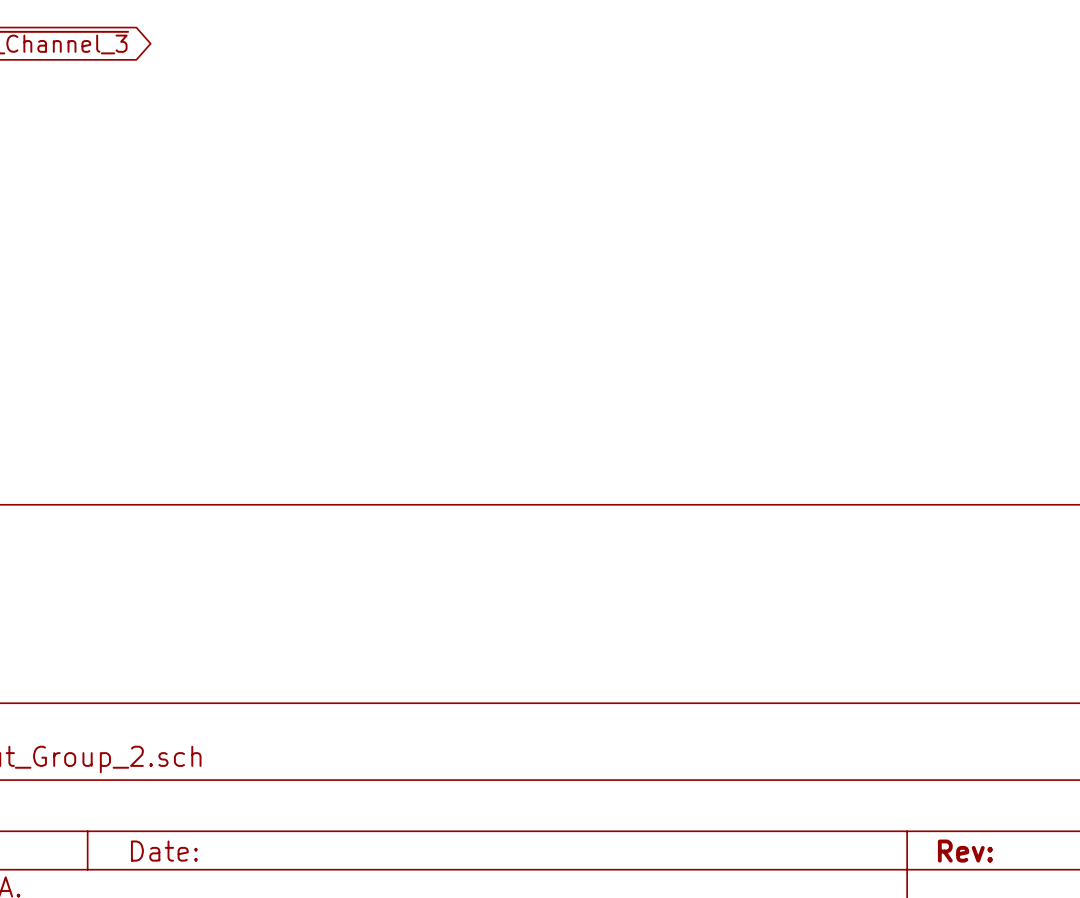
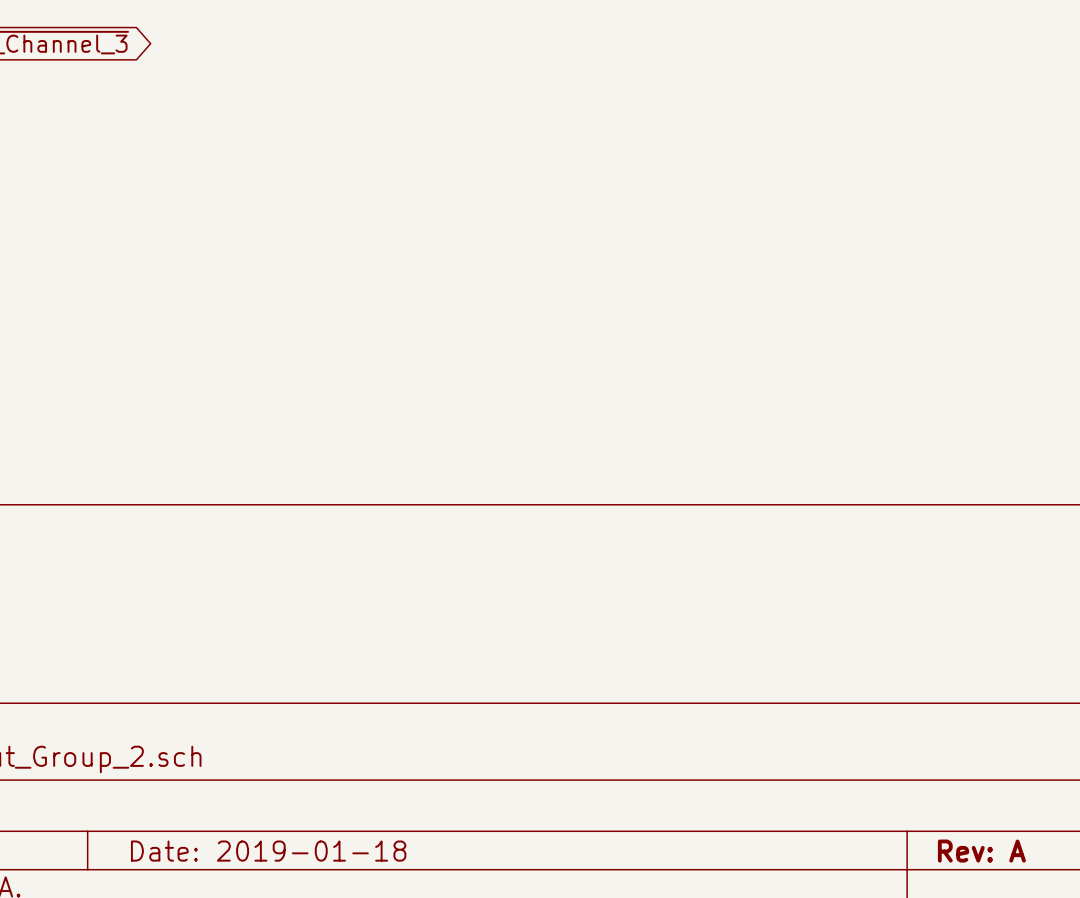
title block: Date: (164, 851) -> Date: 2019-01-18 (268, 851)
title block: Rev: (965, 851) -> Rev: A (981, 851)

